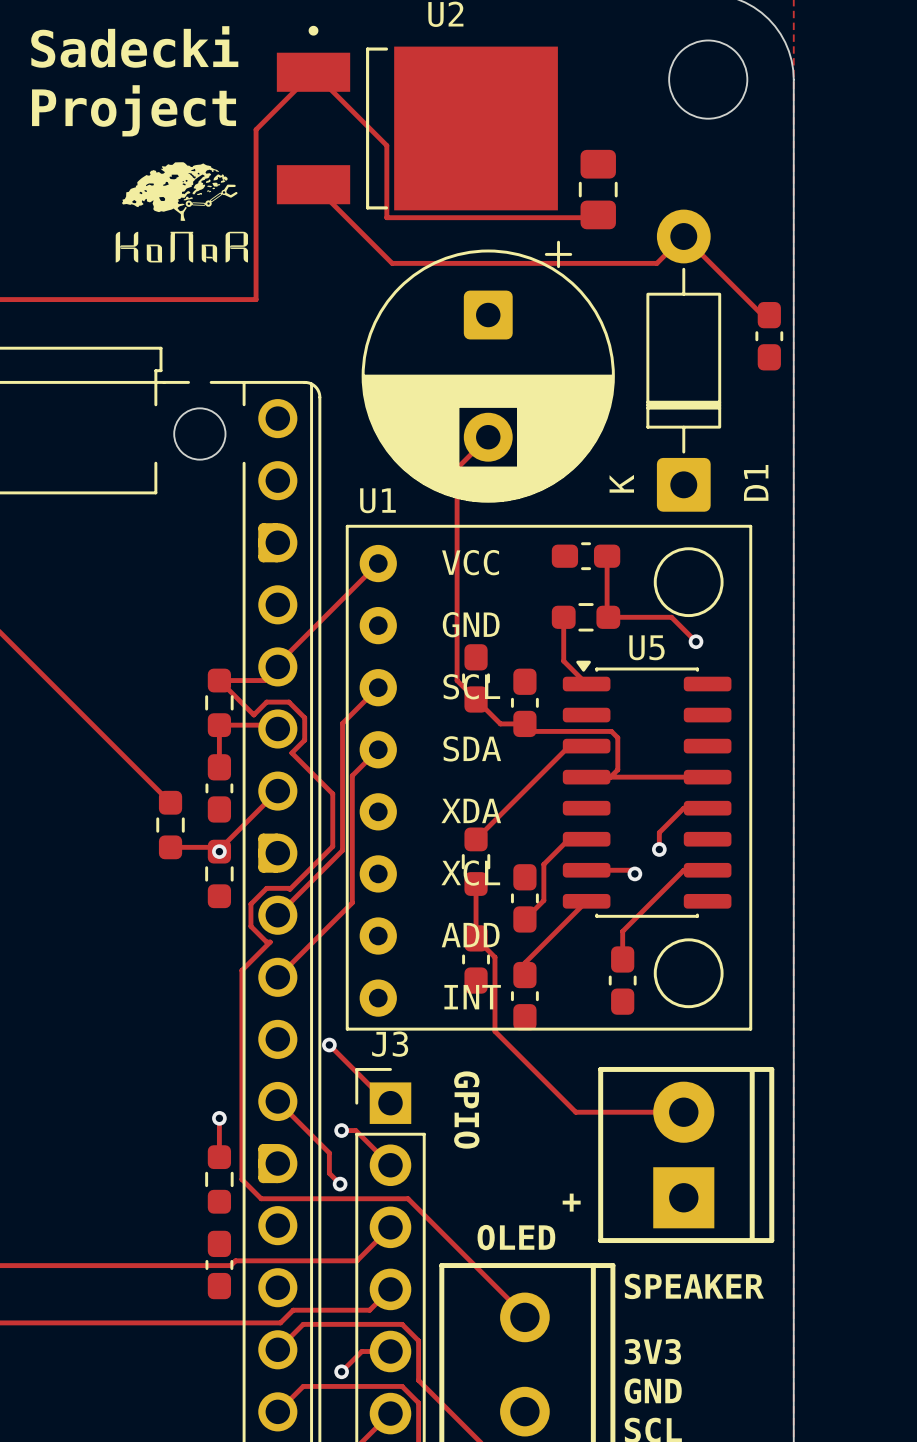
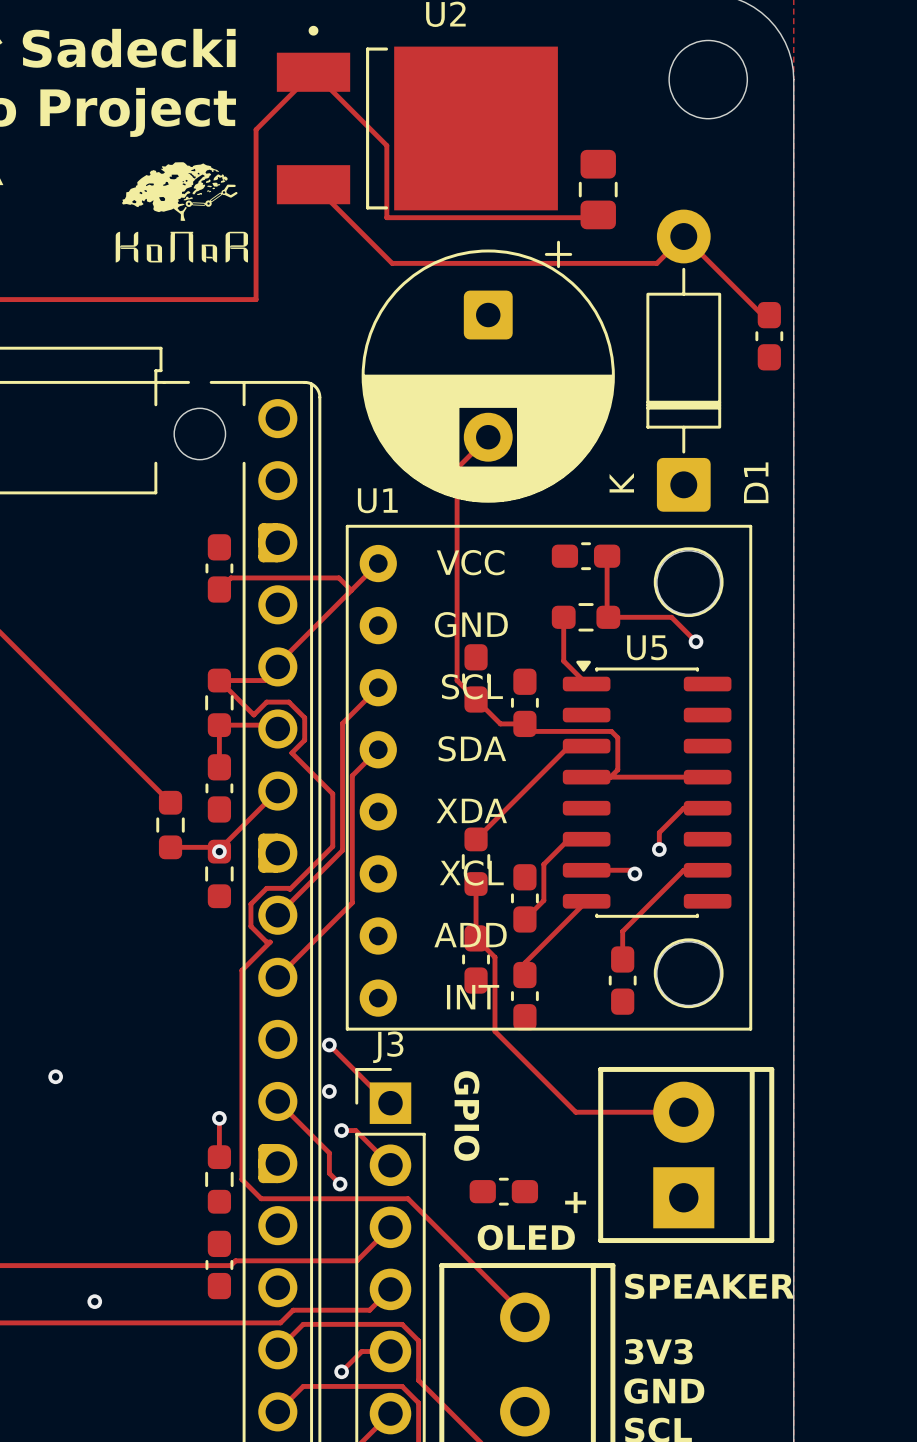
U1 footprint: [345, 524, 753, 1031] -> [345, 524, 753, 1031]
part: none -> (219, 568)
track: none -> (219, 589) (230, 577) (338, 577) (351, 590)
via: none -> (55, 1076)
via: none -> (329, 1091)
part: none -> (503, 1191)
via: none -> (94, 1301)

